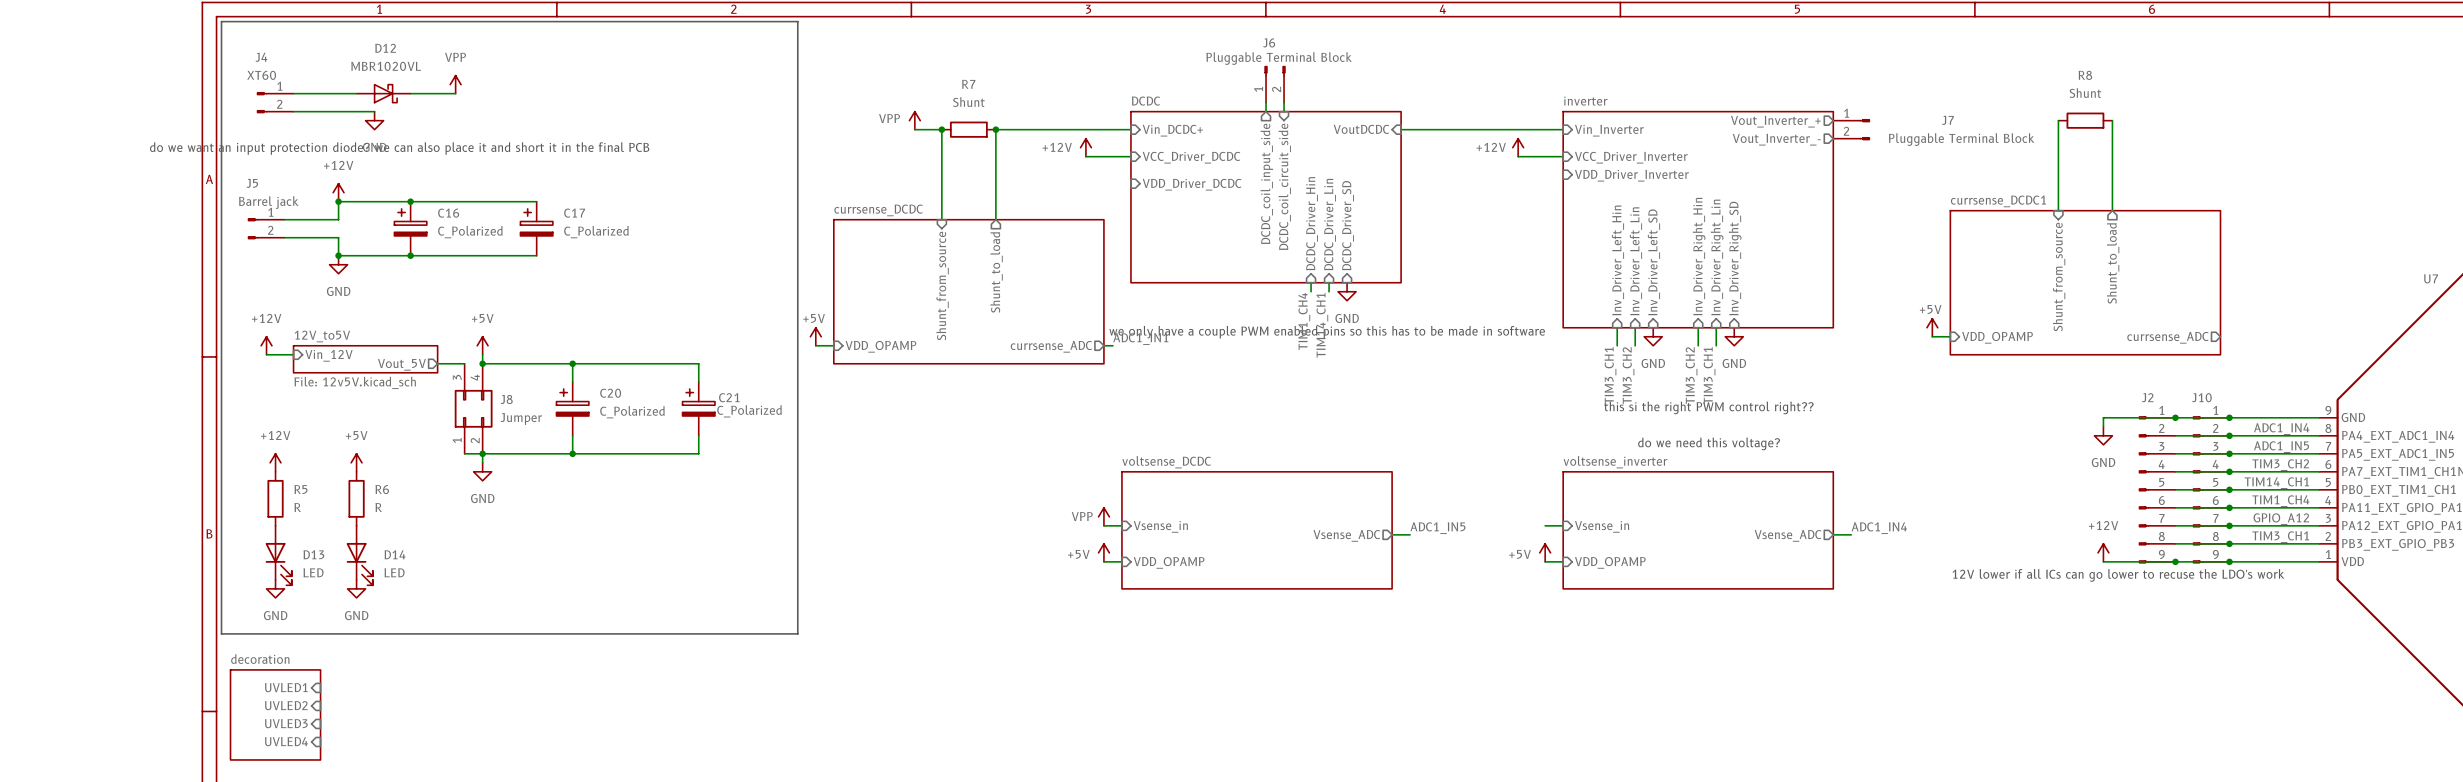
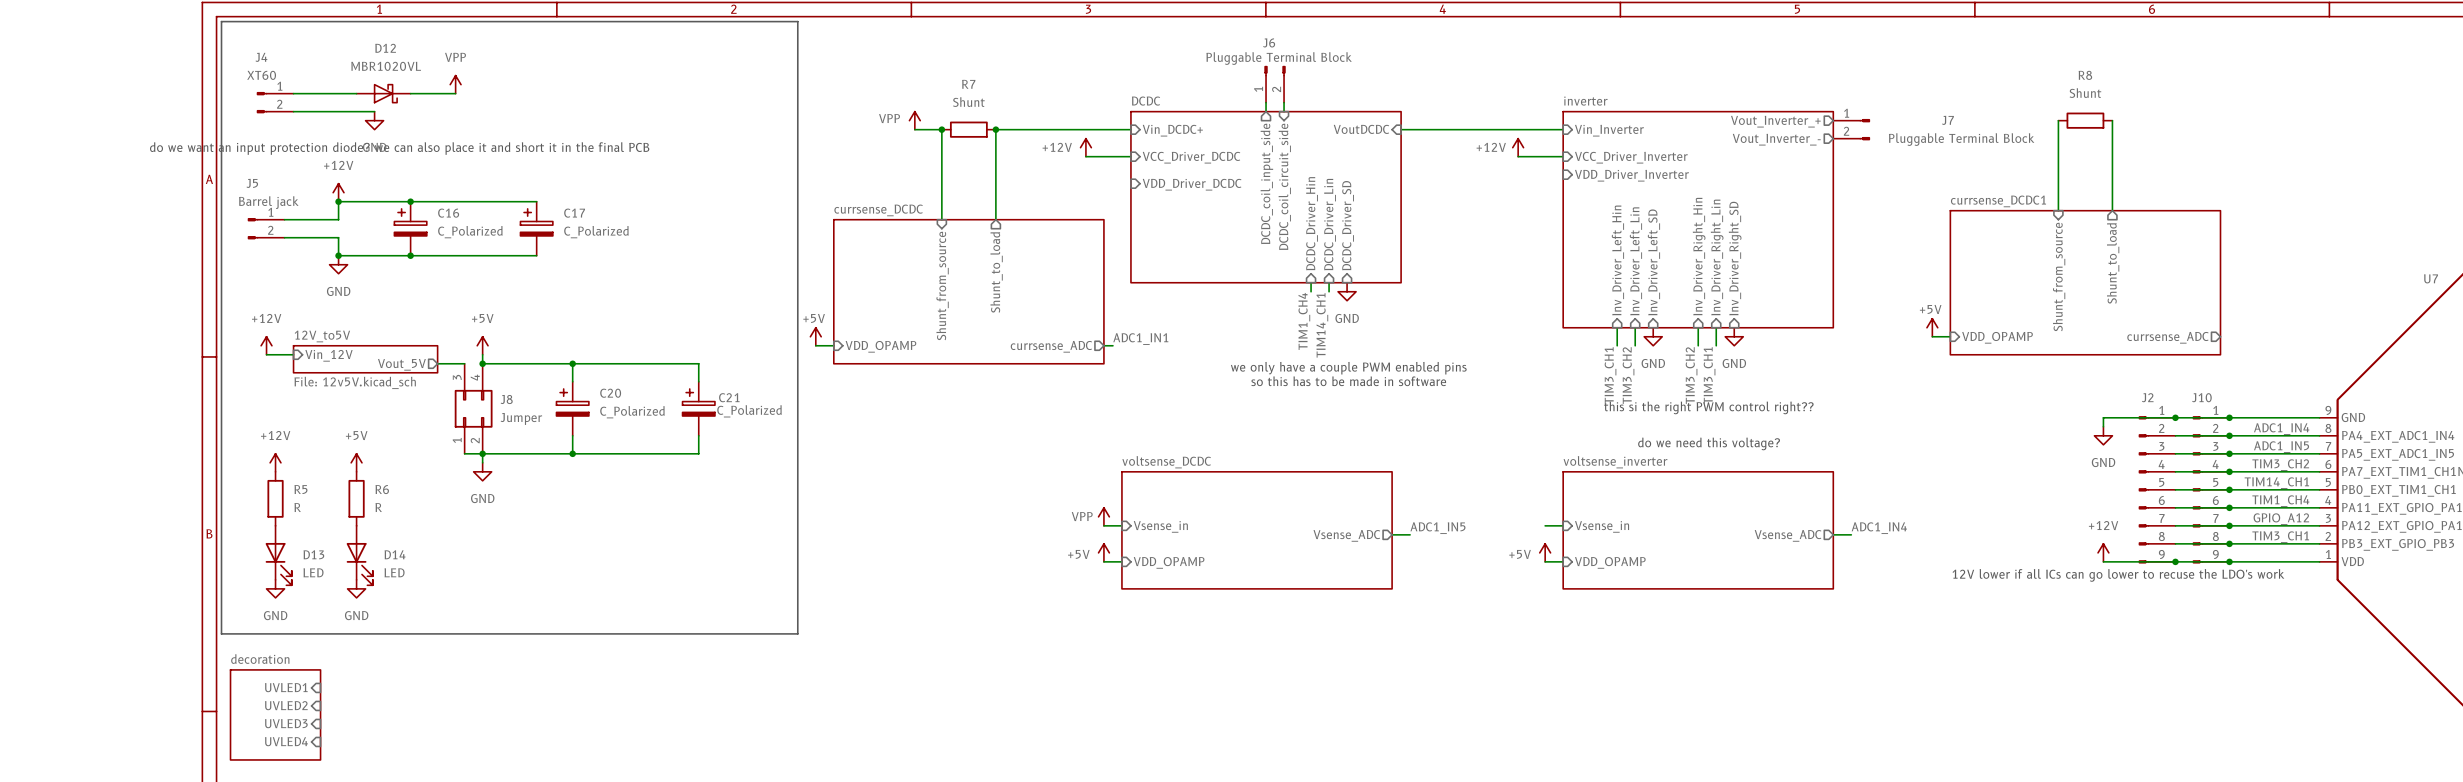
text: we only have a couple PWM enabled pins so this has to be made in software (1327, 332) -> none
text: none -> we only have a couple PWM enabled pins (1348, 368)
text: none -> so this has to be made in software (1348, 381)

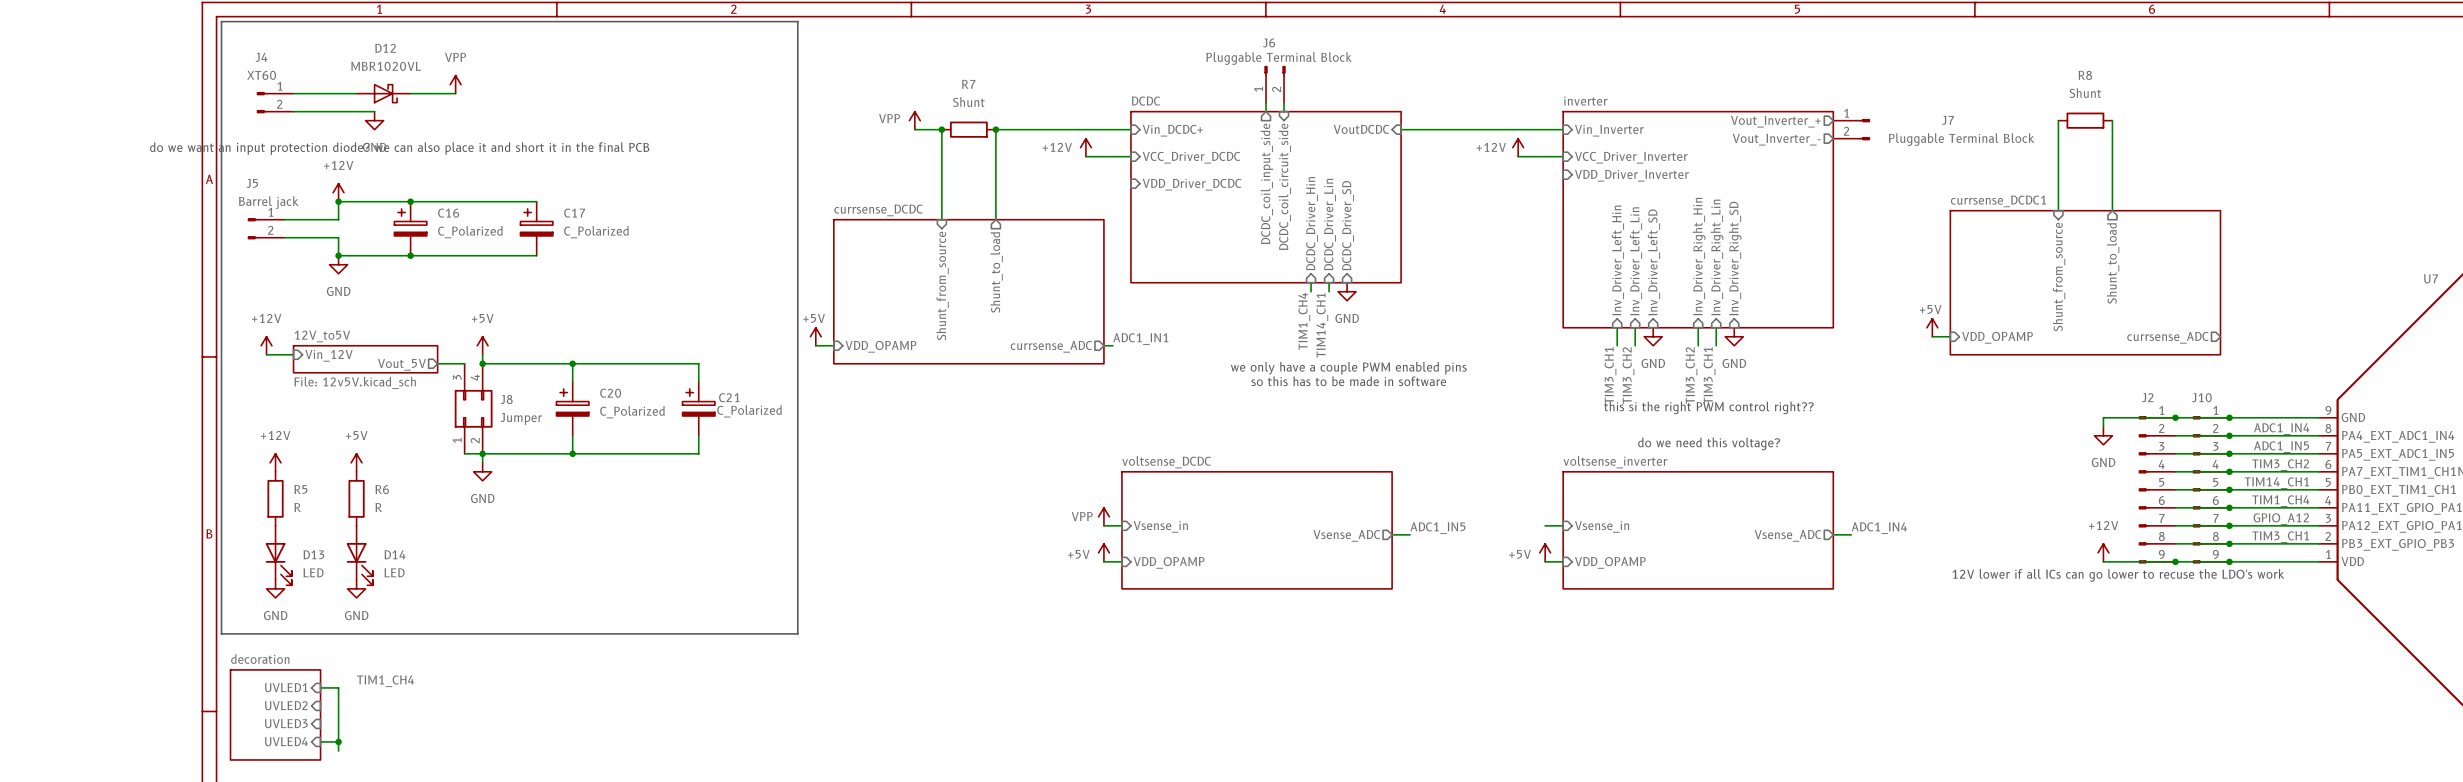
label: none -> TIM1_CH4 (385, 681)
wire: none -> (320, 687) (338, 687) (338, 750)
wire: none -> (320, 741) (338, 741)
junction: none -> (338, 741)

